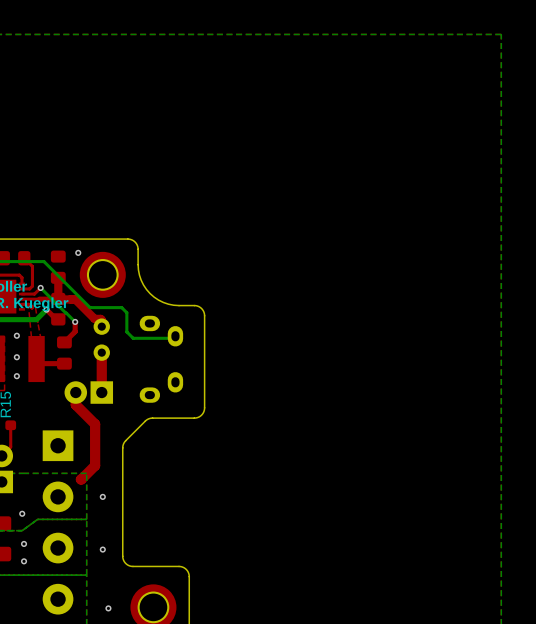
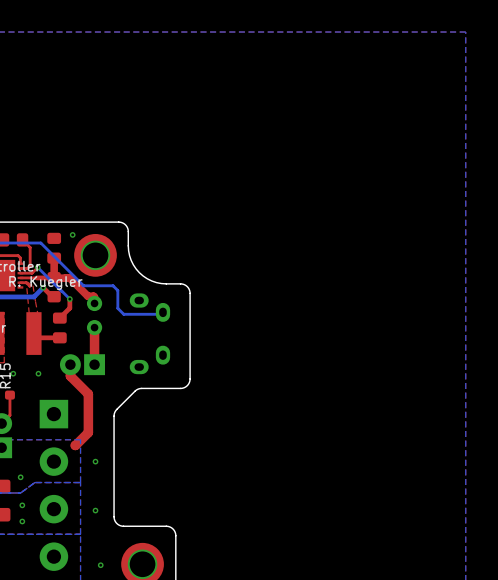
via: (16, 335) -> none
via: (16, 357) -> none
via: (16, 376) -> none
via: none -> (13, 373)
via: none -> (38, 373)

